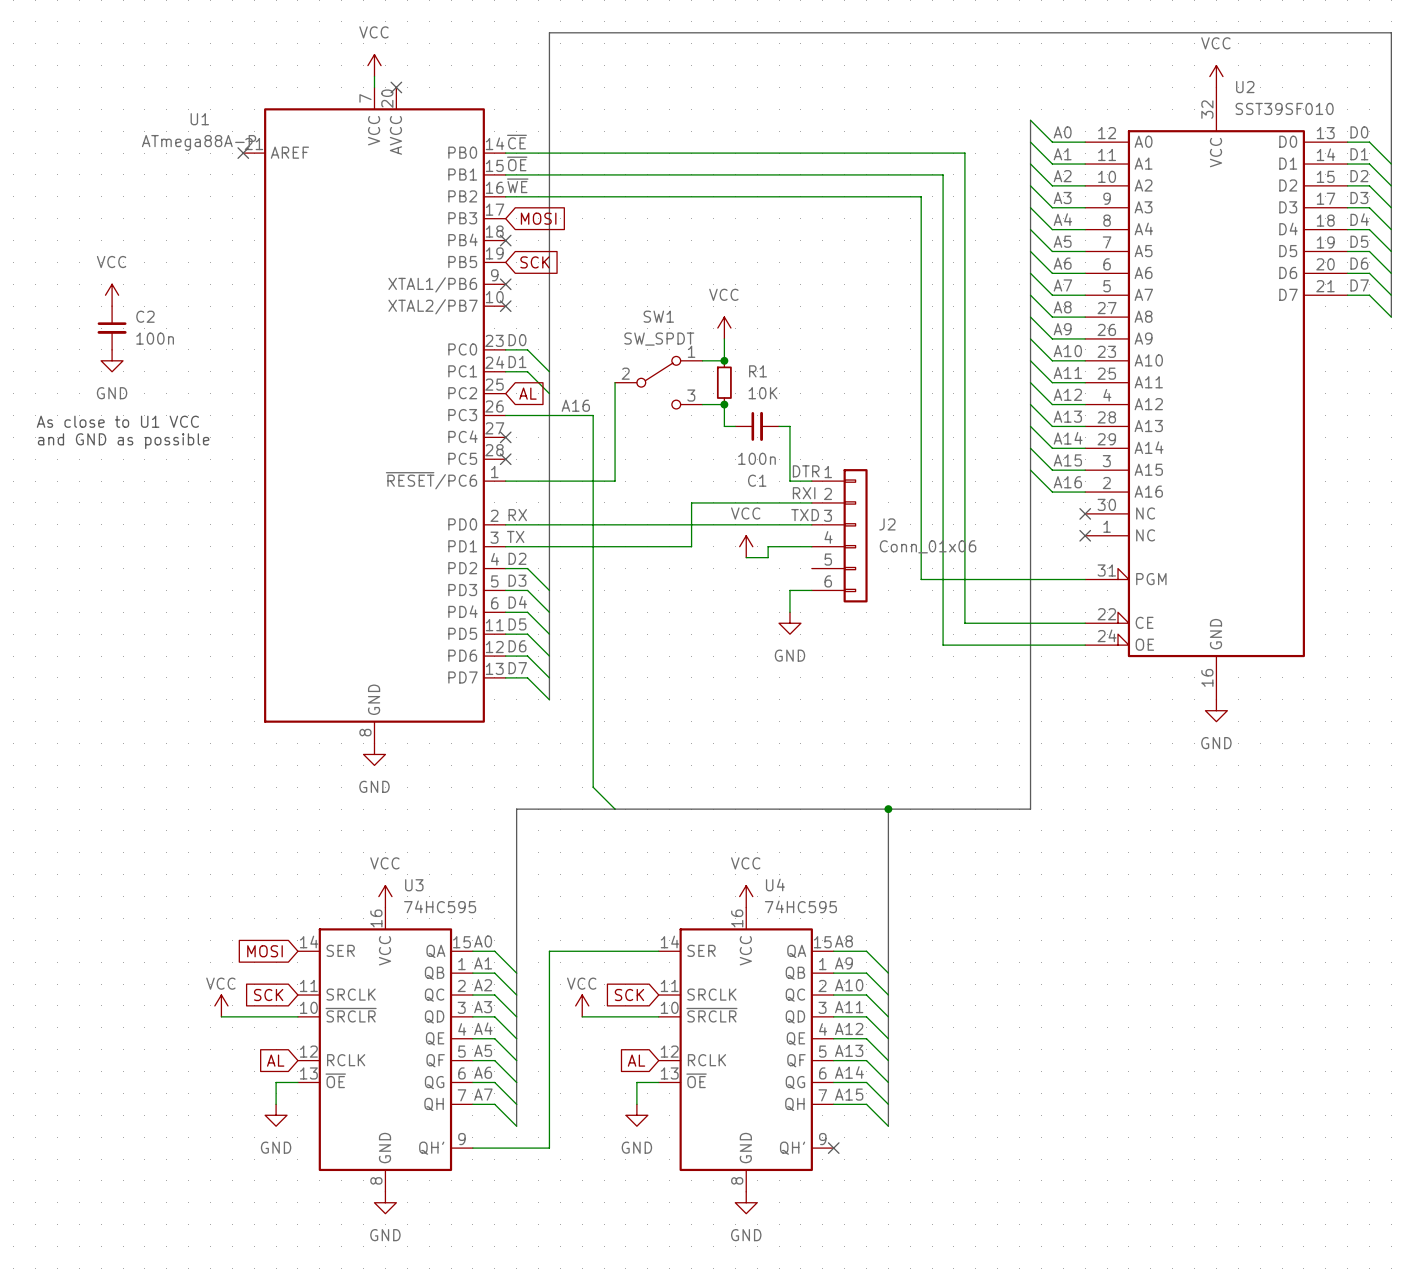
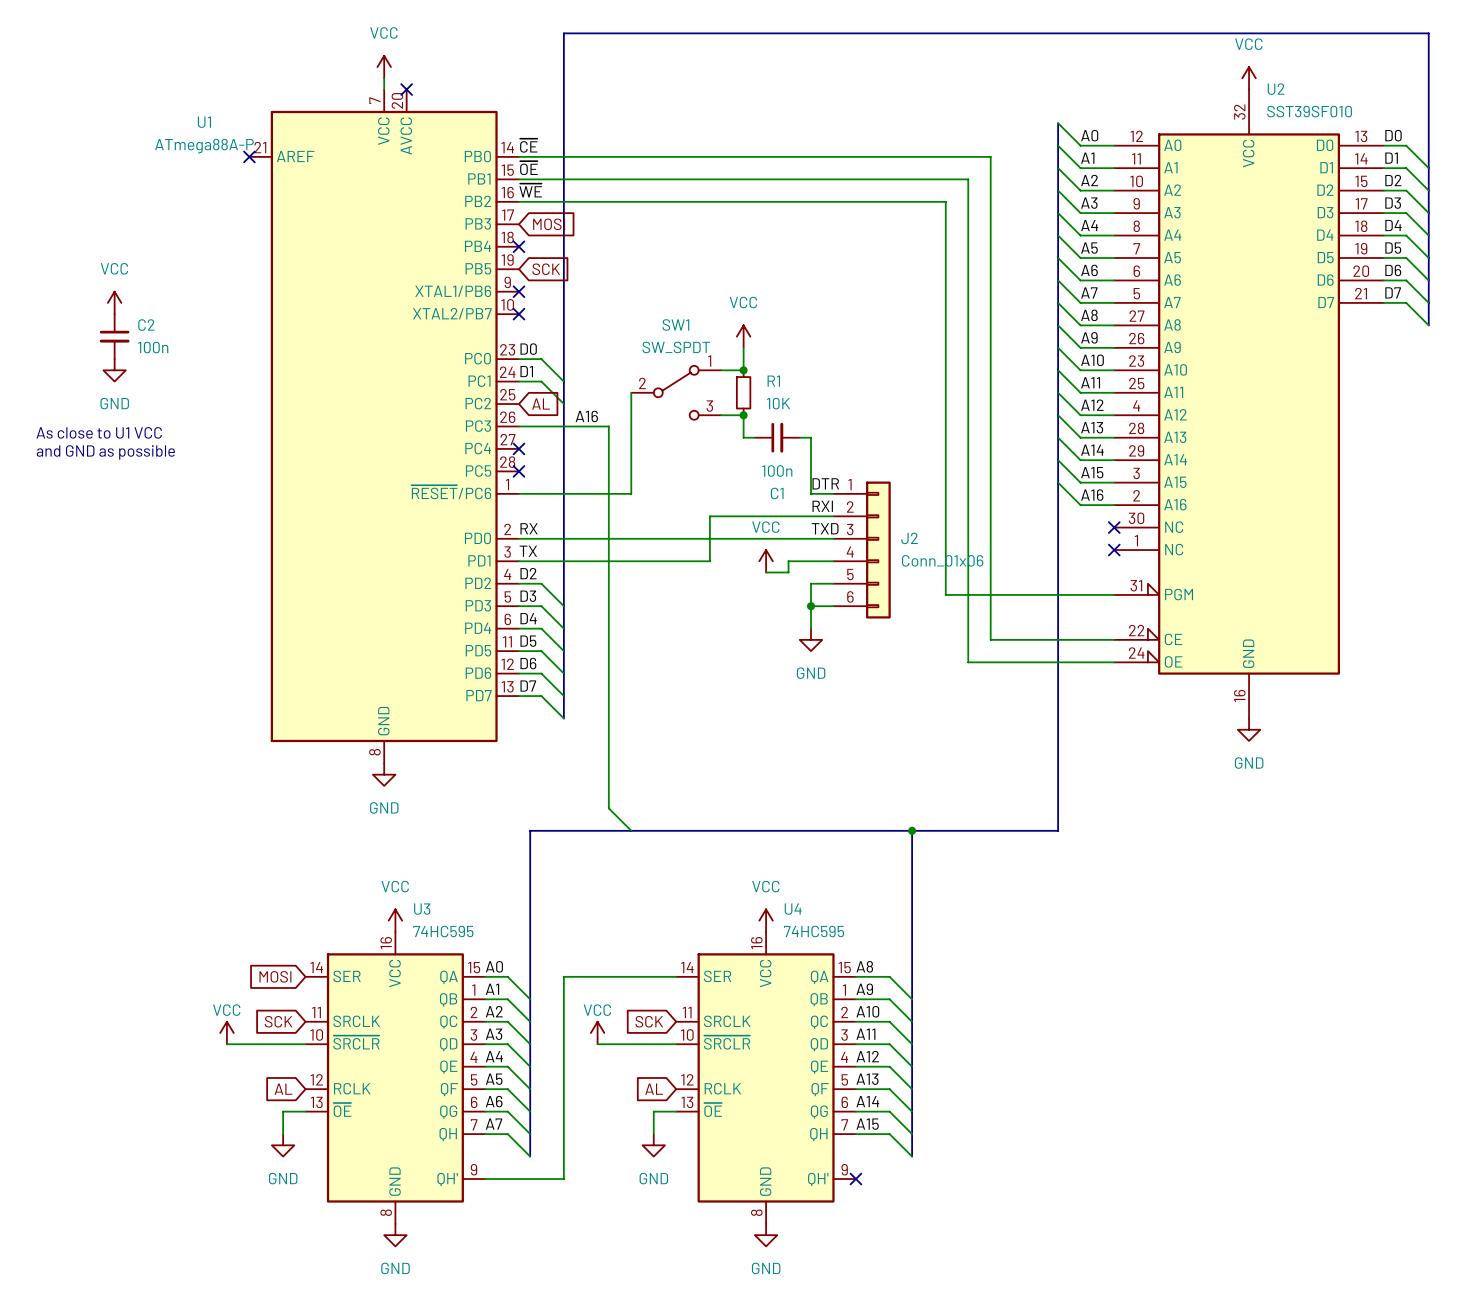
wire: none -> (833, 583) (811, 583) (811, 606)
junction: none -> (811, 606)

